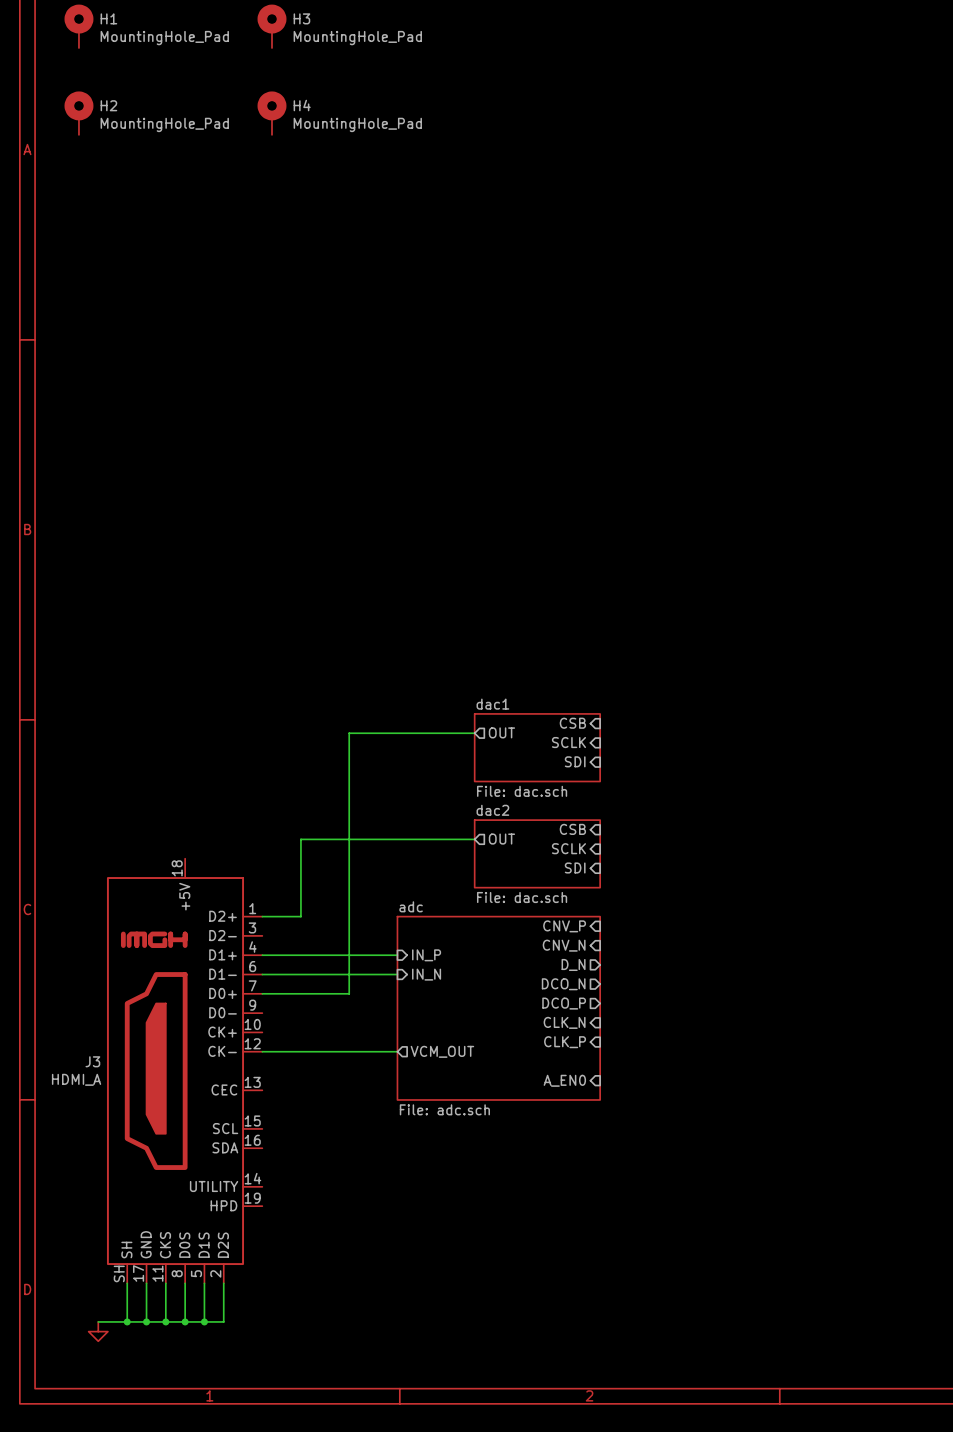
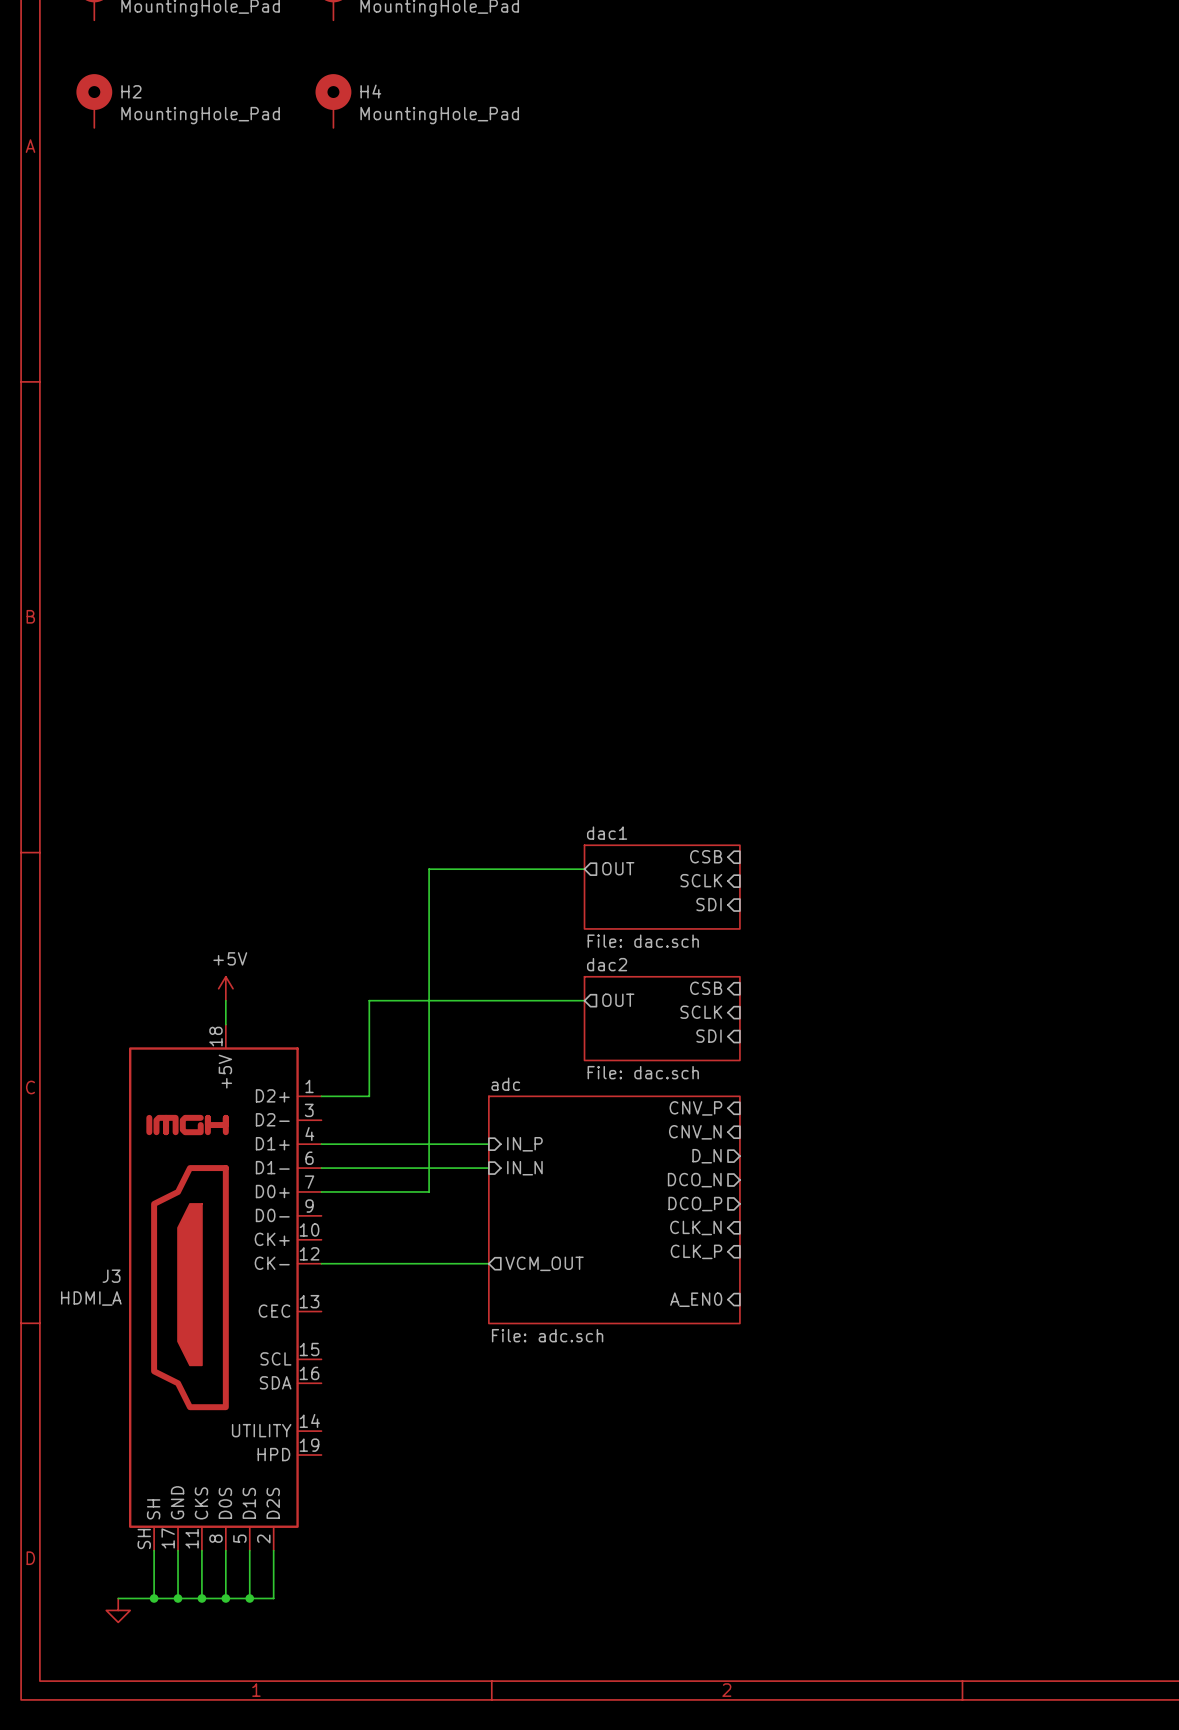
power symbol: none -> +5V (225, 988)
wire: none -> (225, 1000) (225, 1024)

